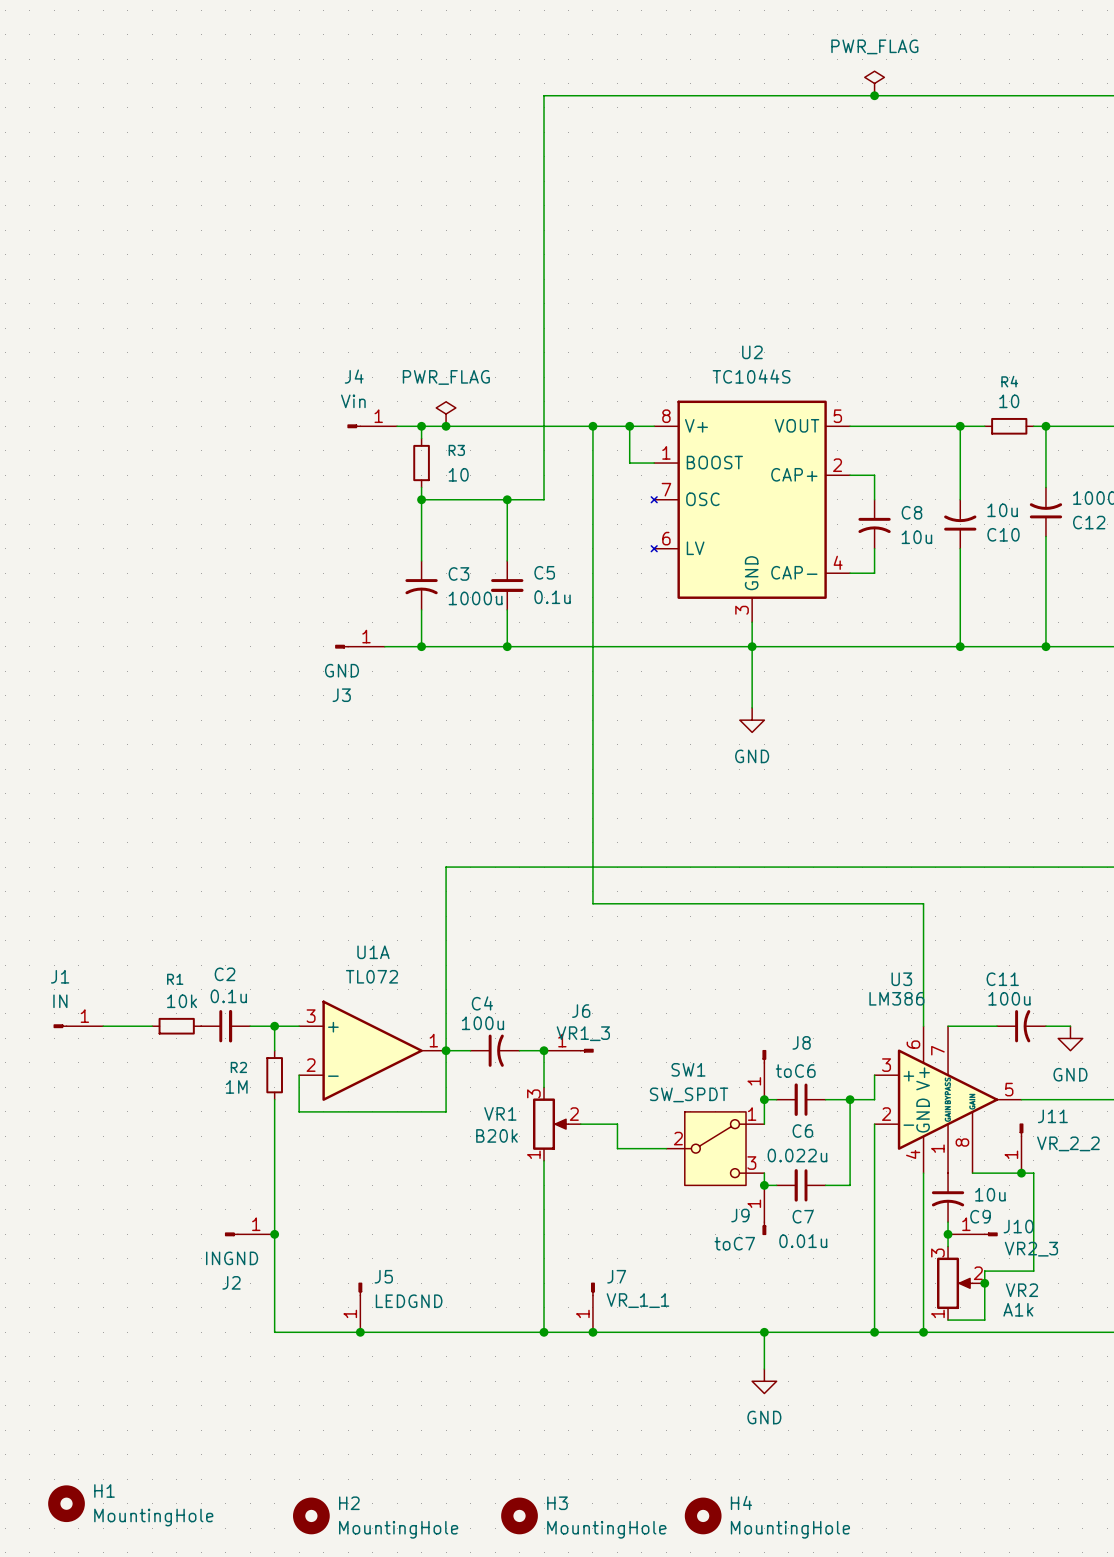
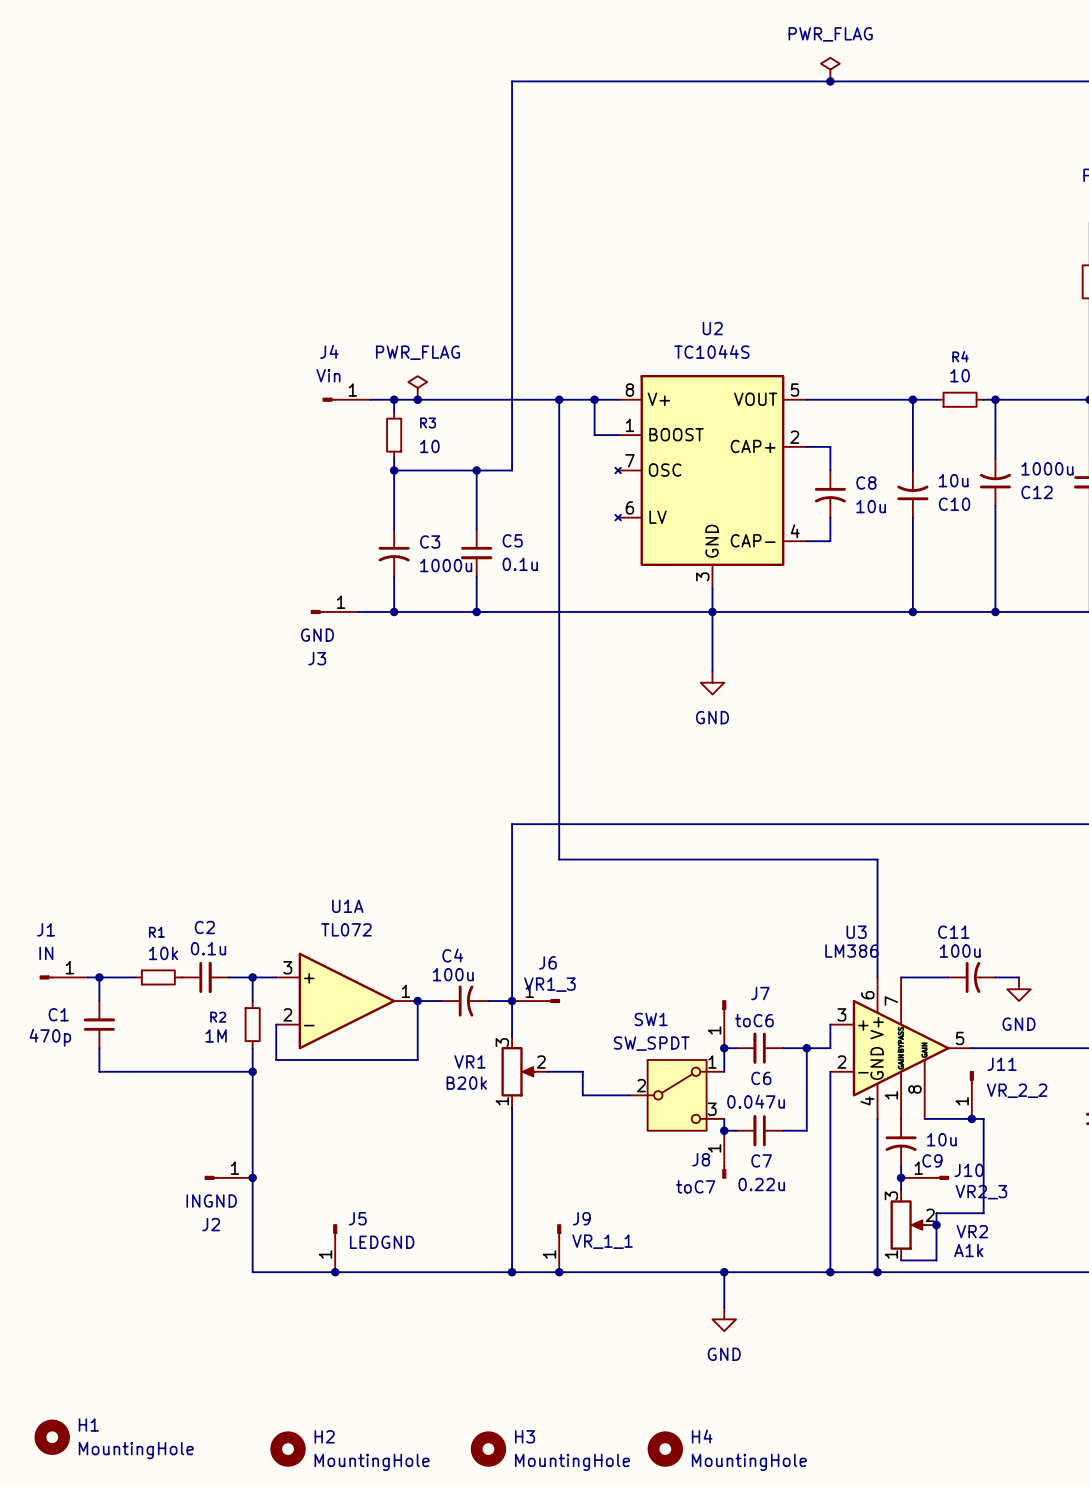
wire: (544, 867) (446, 867) (446, 1050) -> (512, 824) (512, 1001)
wire: none -> (99, 977) (99, 1001)
junction: none -> (99, 977)
J8 name: J8 (801, 1042) -> J7 (760, 993)
C1: none -> 470p (99, 1024)
wire: none -> (99, 1048) (99, 1071) (252, 1071)
junction: none -> (252, 1071)
C6 value: 0.022u (797, 1155) -> 0.047u (756, 1101)
J9 name: J9 (740, 1215) -> J8 (701, 1159)
C7 value: 0.01u (803, 1241) -> 0.22u (761, 1184)
J7 name: J7 (616, 1276) -> J9 (581, 1218)

